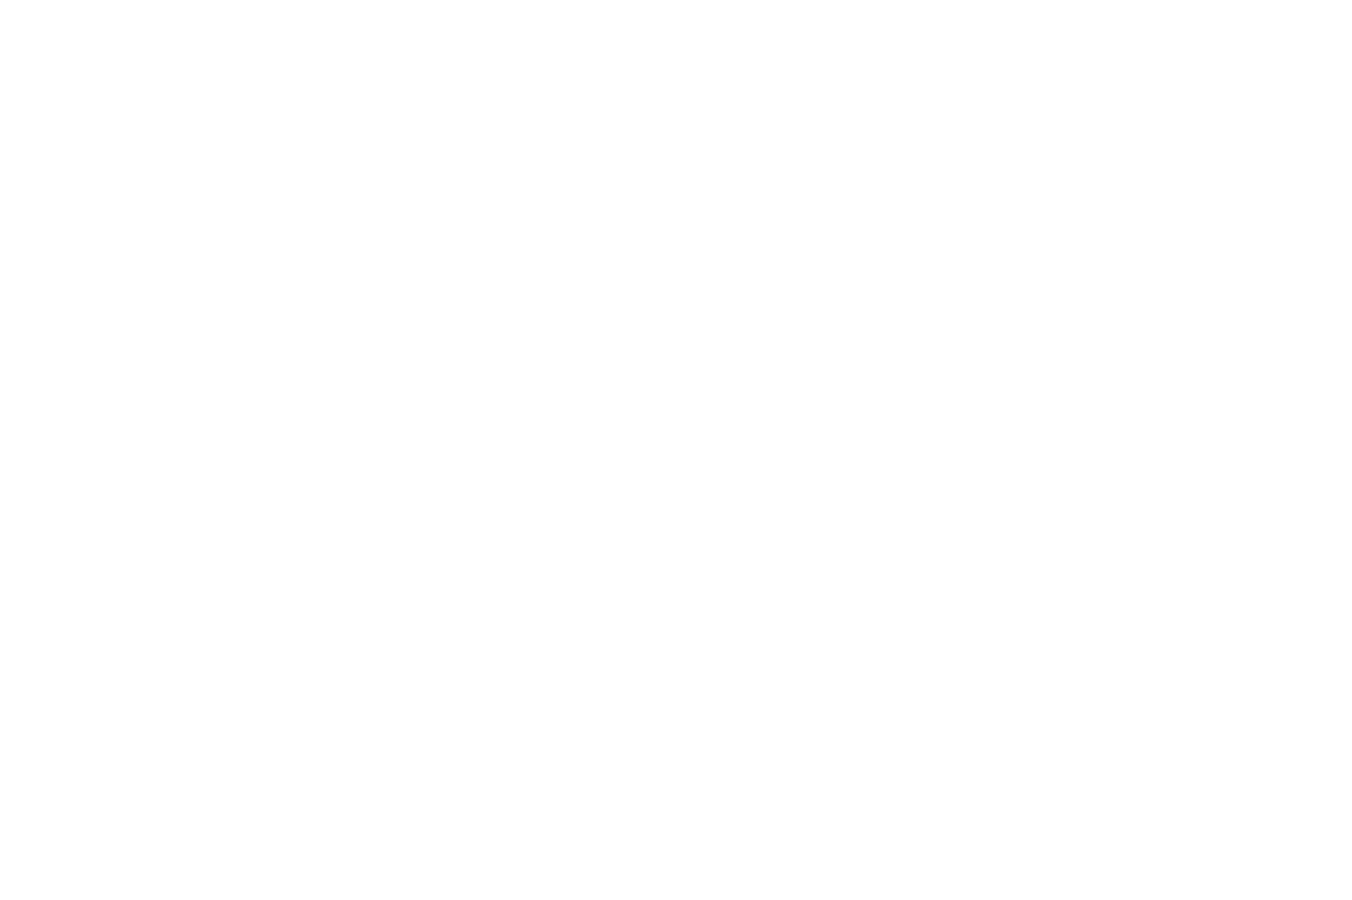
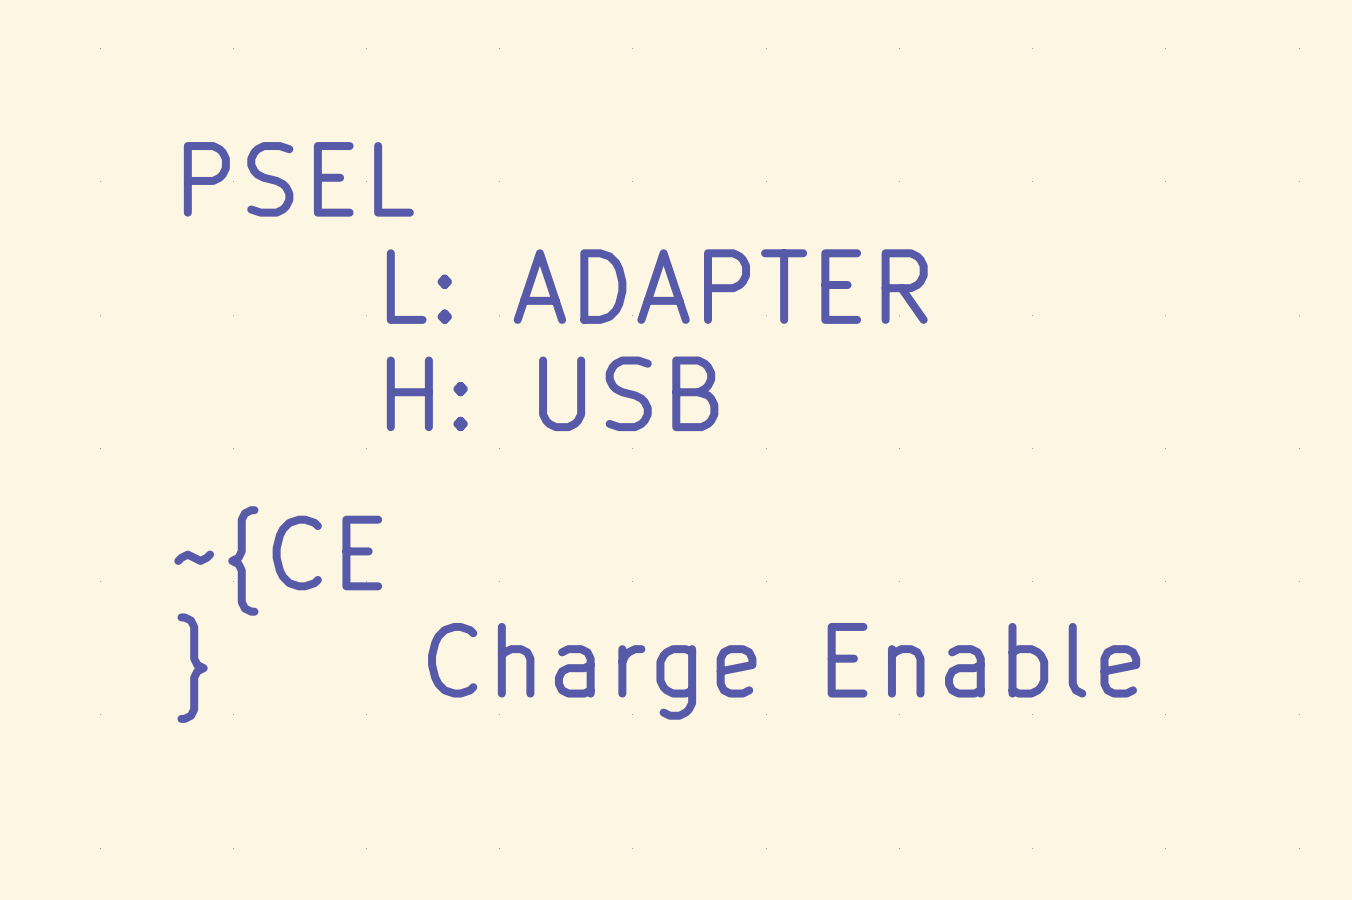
text: none -> PSEL (298, 179)
text: none -> L: ADAPTER (657, 286)
text: none -> H: USB (552, 393)
text: none -> ~{CE (278, 560)
text: none -> } Charge Enable (658, 668)

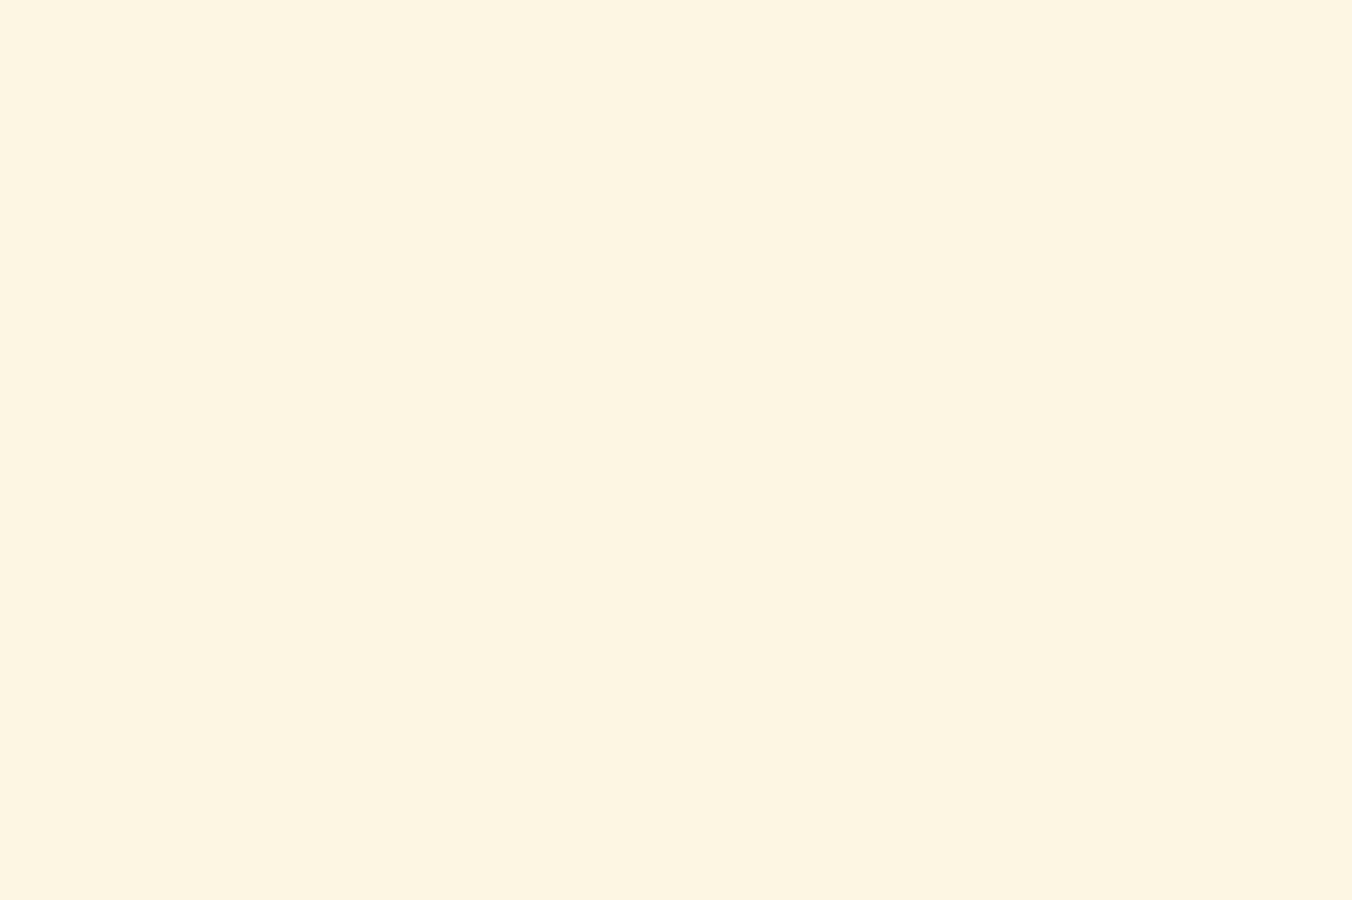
text: PSEL (298, 179) -> none
text: L: ADAPTER (657, 286) -> none
text: H: USB (552, 393) -> none
text: ~{CE (278, 560) -> none
text: } Charge Enable (658, 668) -> none

